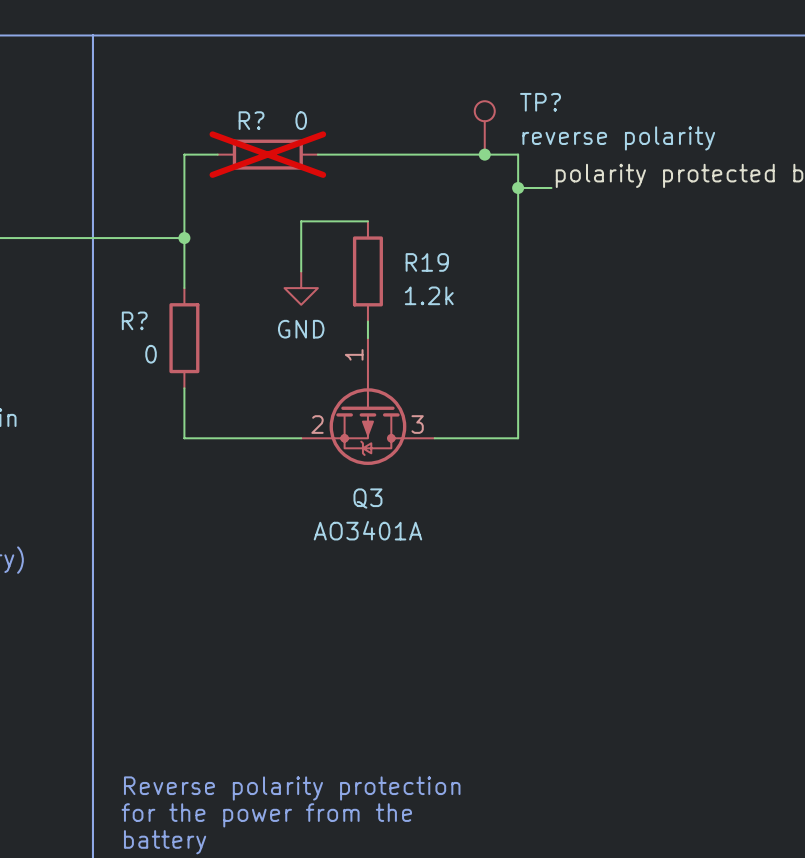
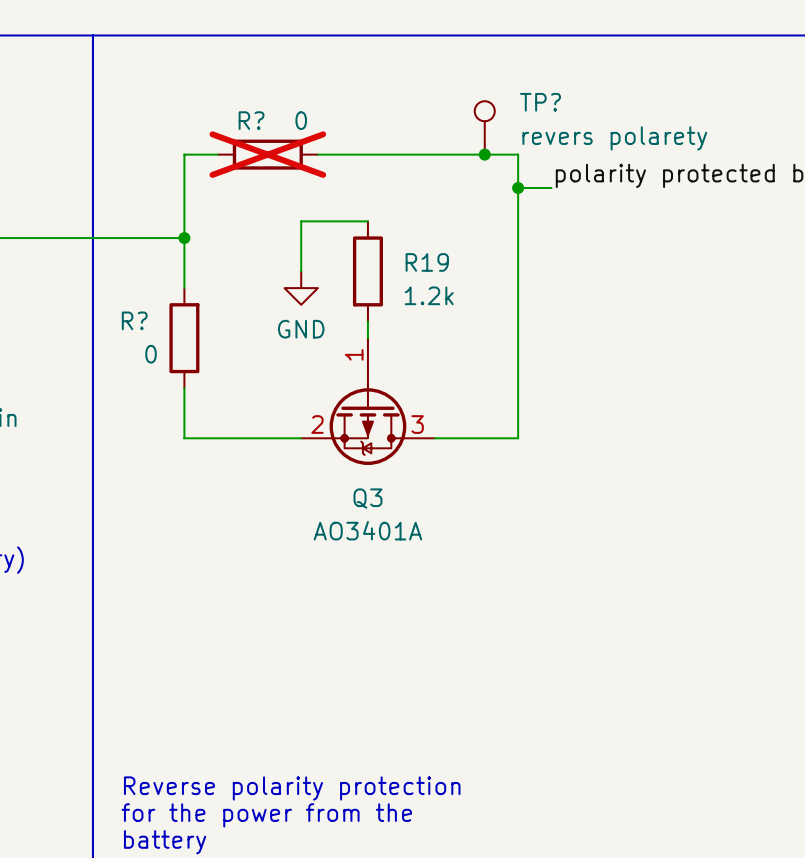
TP? value: reverse polarity (618, 138) -> revers polarety (614, 138)

